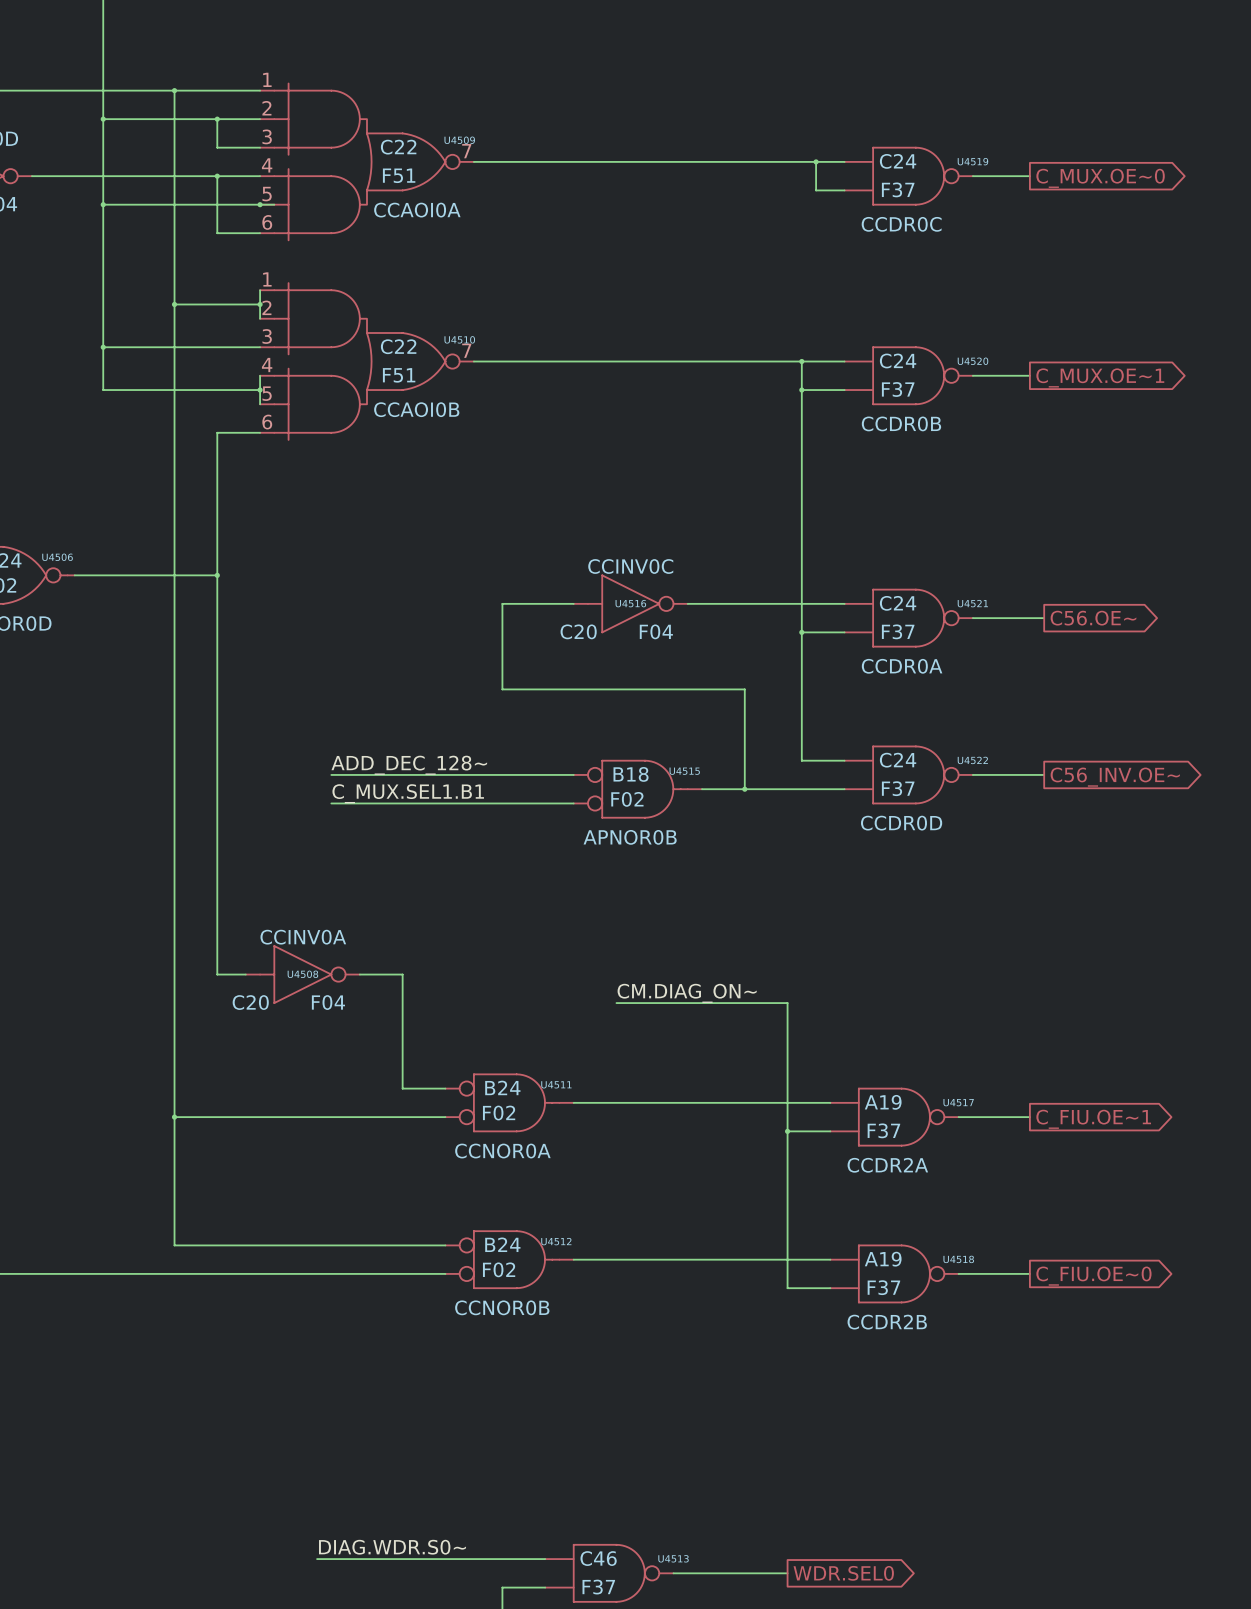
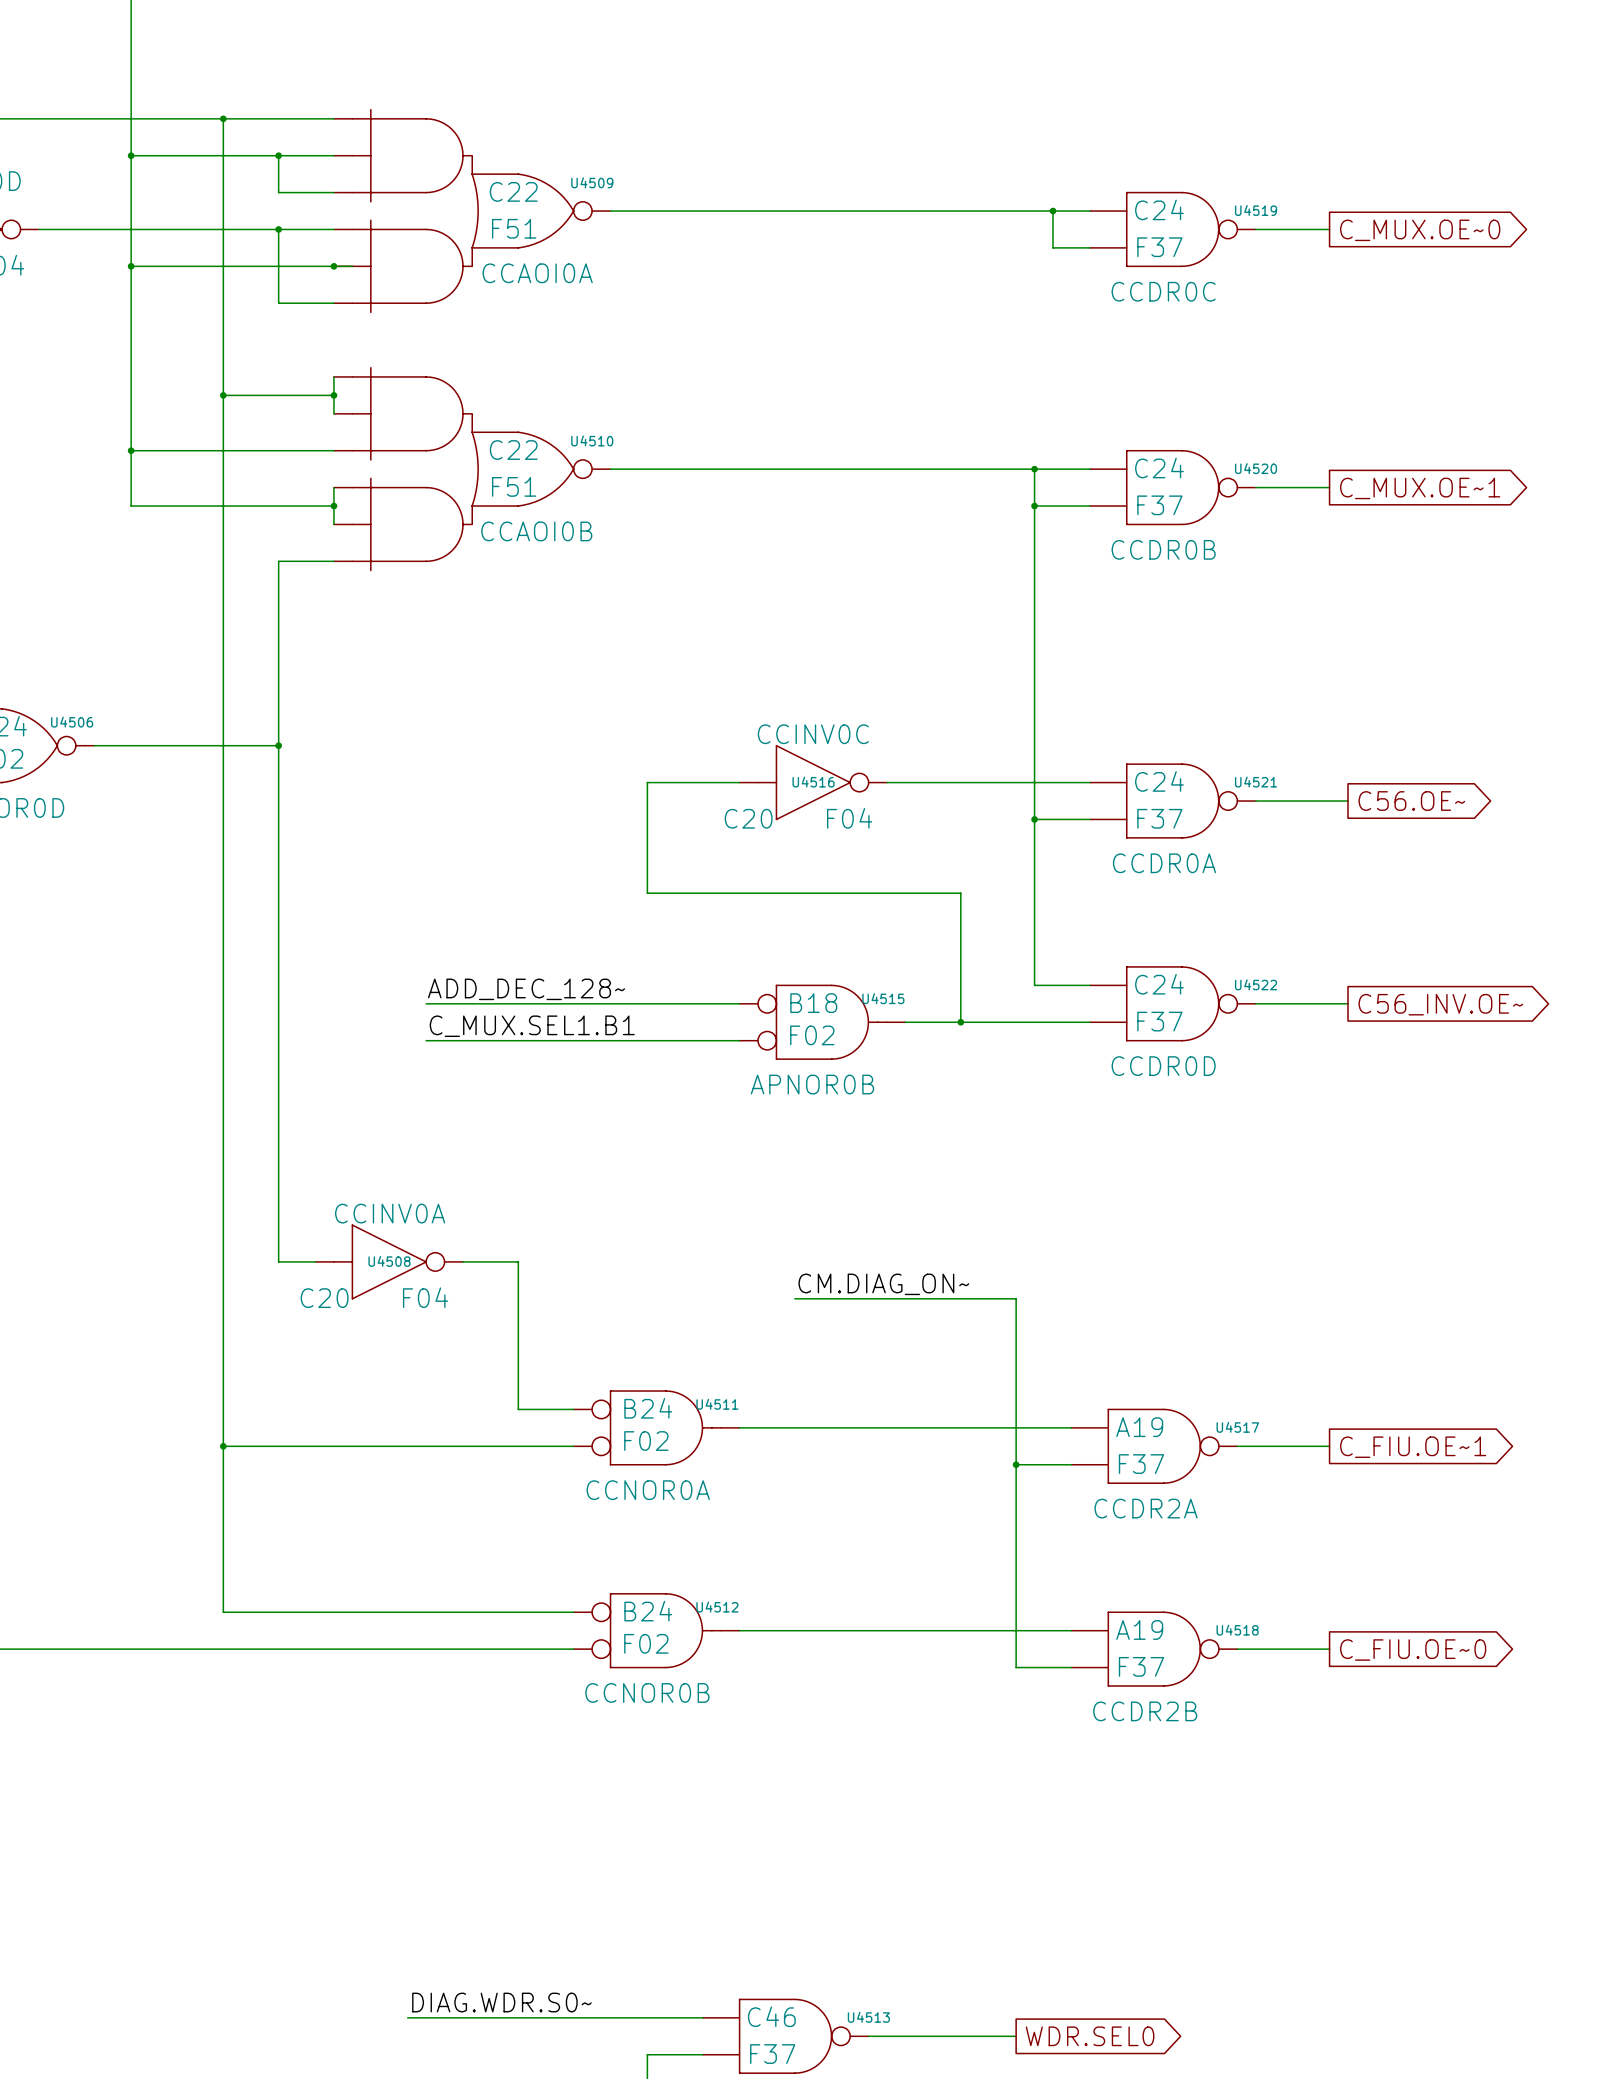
U4509 pin number: 1 (267, 79) -> none
U4509 pin number: 2 (266, 108) -> none
U4509 pin number: 3 (267, 136) -> none
U4509 pin number: 7 (466, 151) -> none
U4509 pin number: 4 (267, 165) -> none
U4509 pin number: 5 (267, 194) -> none
U4509 pin number: 6 (267, 222) -> none
U4510 pin number: 1 (267, 279) -> none
U4510 pin number: 2 (266, 307) -> none
U4510 pin number: 3 (267, 336) -> none
U4510 pin number: 7 (466, 350) -> none
U4510 pin number: 4 (267, 365) -> none
U4510 pin number: 5 (267, 393) -> none
U4510 pin number: 6 (267, 422) -> none

